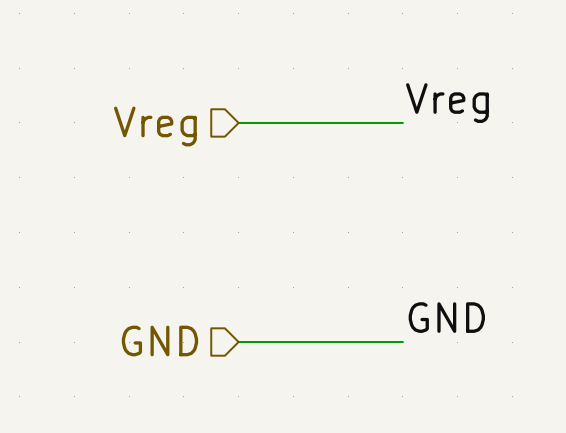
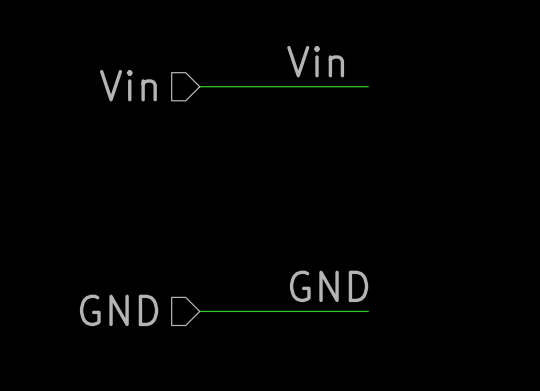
label: none -> Vin (315, 61)
label: Vreg (447, 103) -> none
hierarchical label: Vreg (155, 126) -> Vin (128, 85)
label position: GND (446, 317) -> GND (329, 286)

